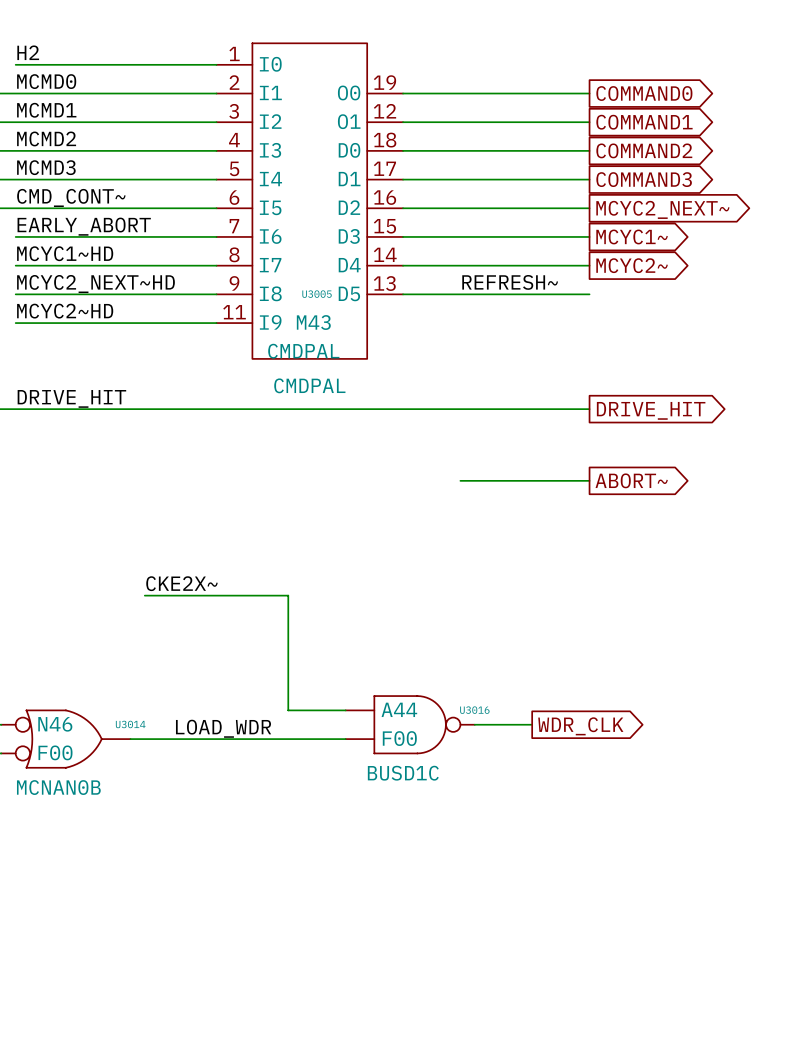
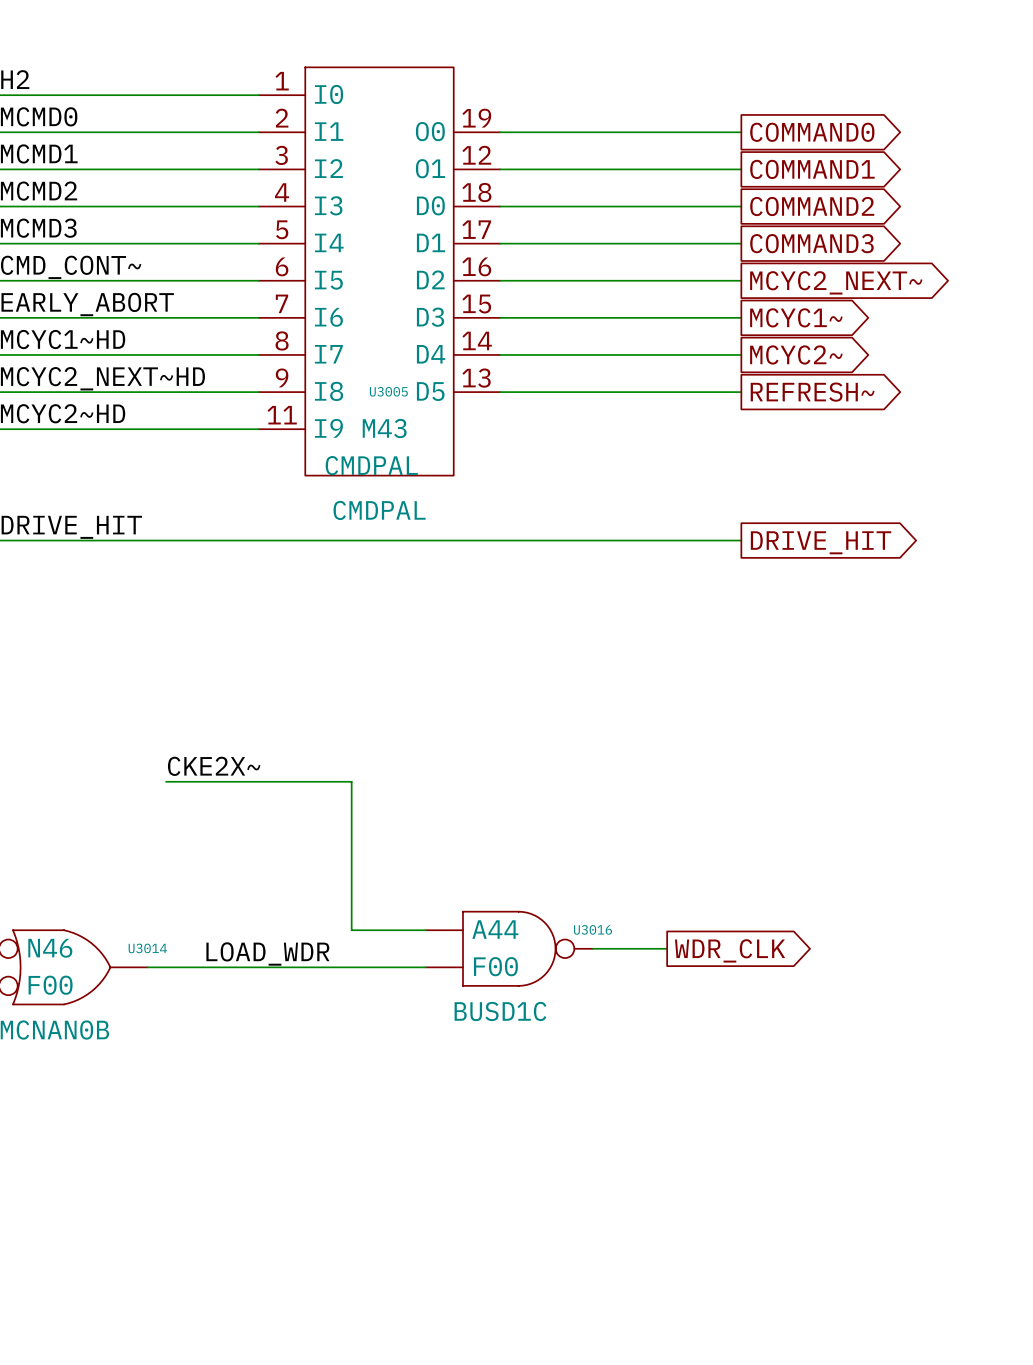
label: REFRESH~ (510, 282) -> none
global label: none -> REFRESH~ (812, 392)
wire: (460, 480) (589, 480) -> none
global label: ABORT~ (631, 480) -> none

